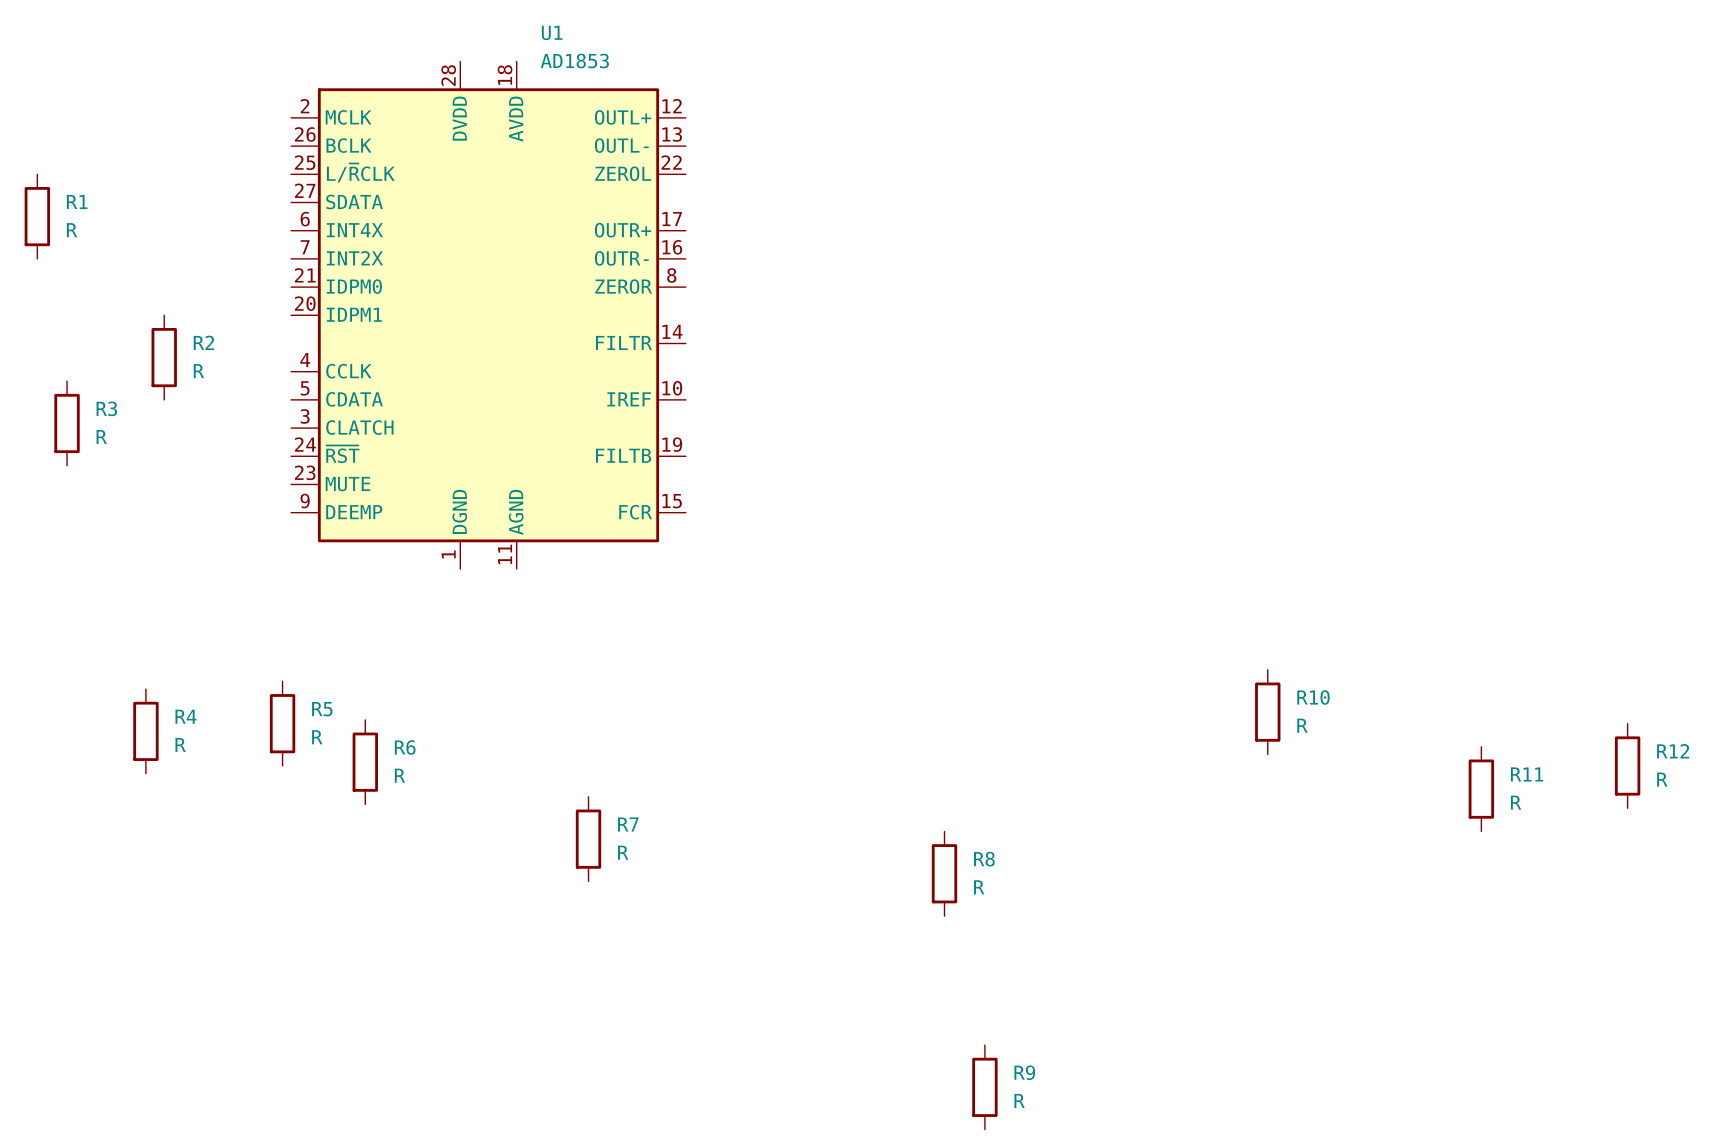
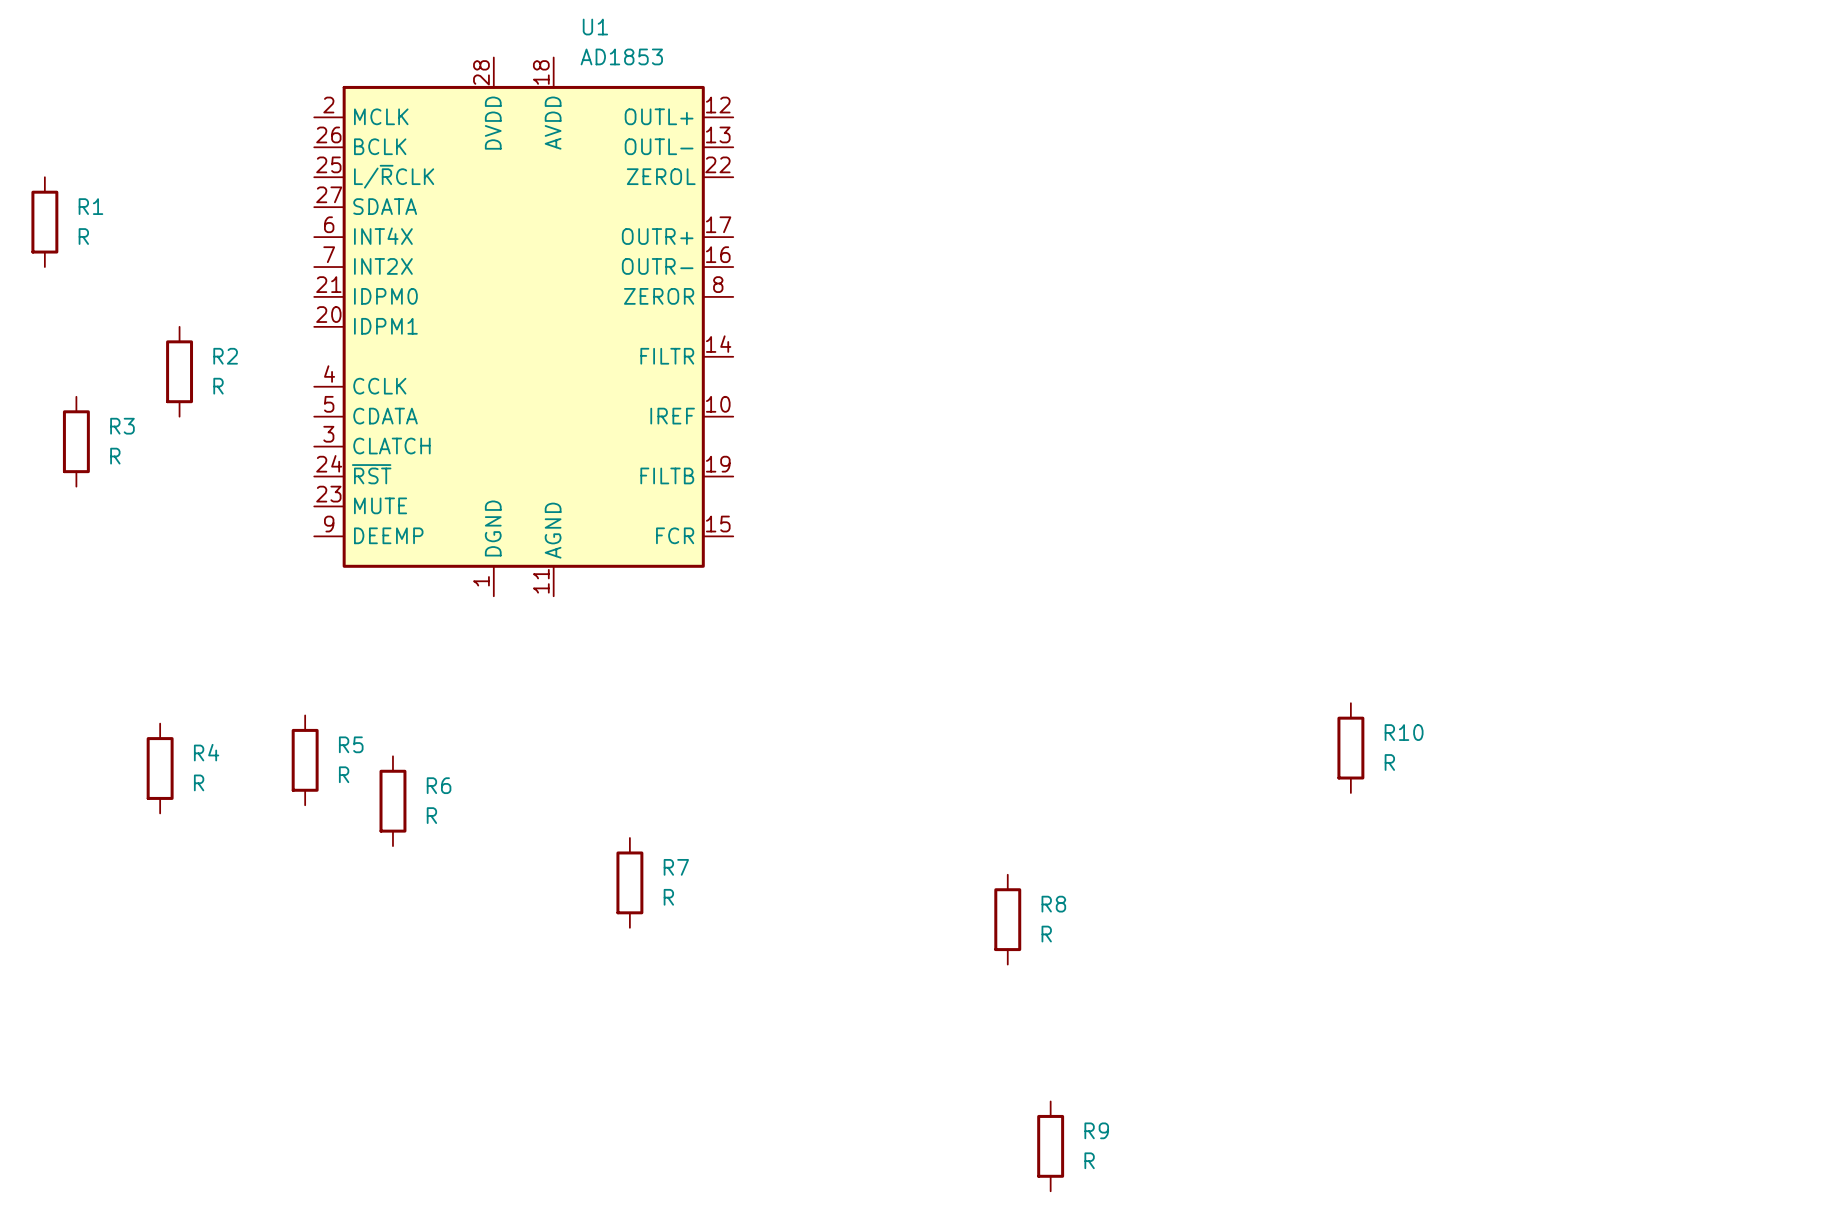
R12: R (1627, 766) -> none
R11: R (1481, 789) -> none

